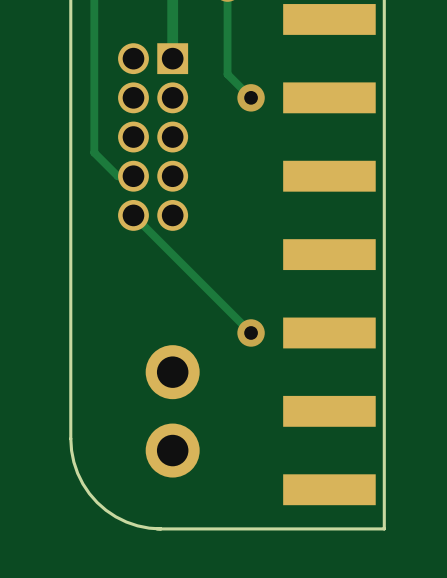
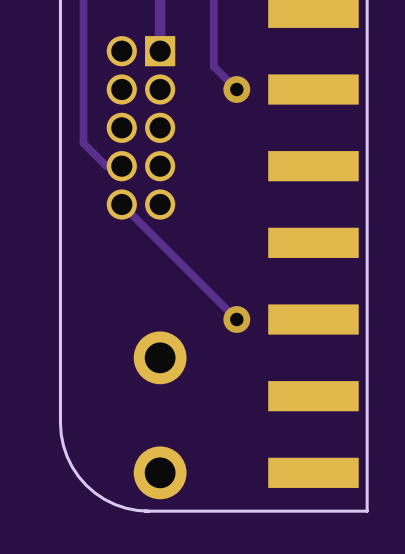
part position: (172, 450) -> (160, 472)

